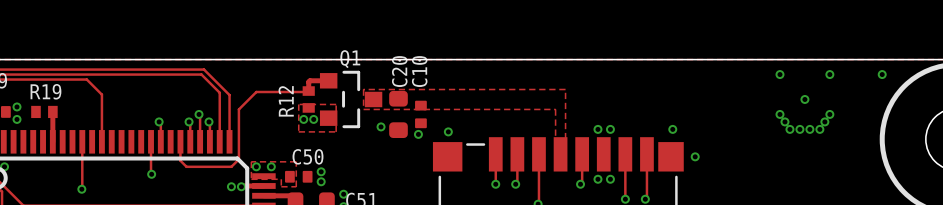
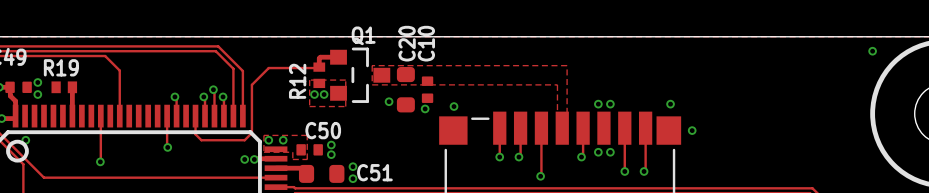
via: (779, 74) -> none
via: (829, 74) -> none
via: (804, 99) -> none
via: (779, 114) -> none
via: (829, 114) -> none
via: (784, 121) -> none
via: (824, 121) -> none
via: (789, 129) -> none
via: (799, 129) -> none
via: (809, 129) -> none
via: (819, 129) -> none

